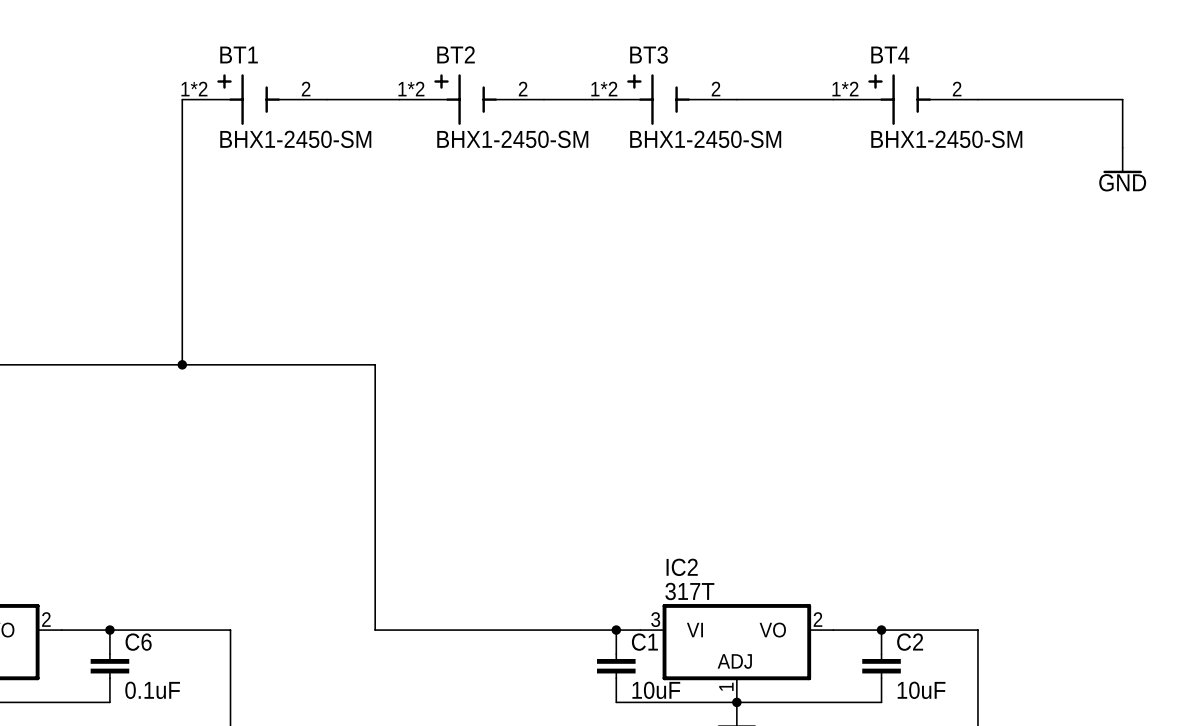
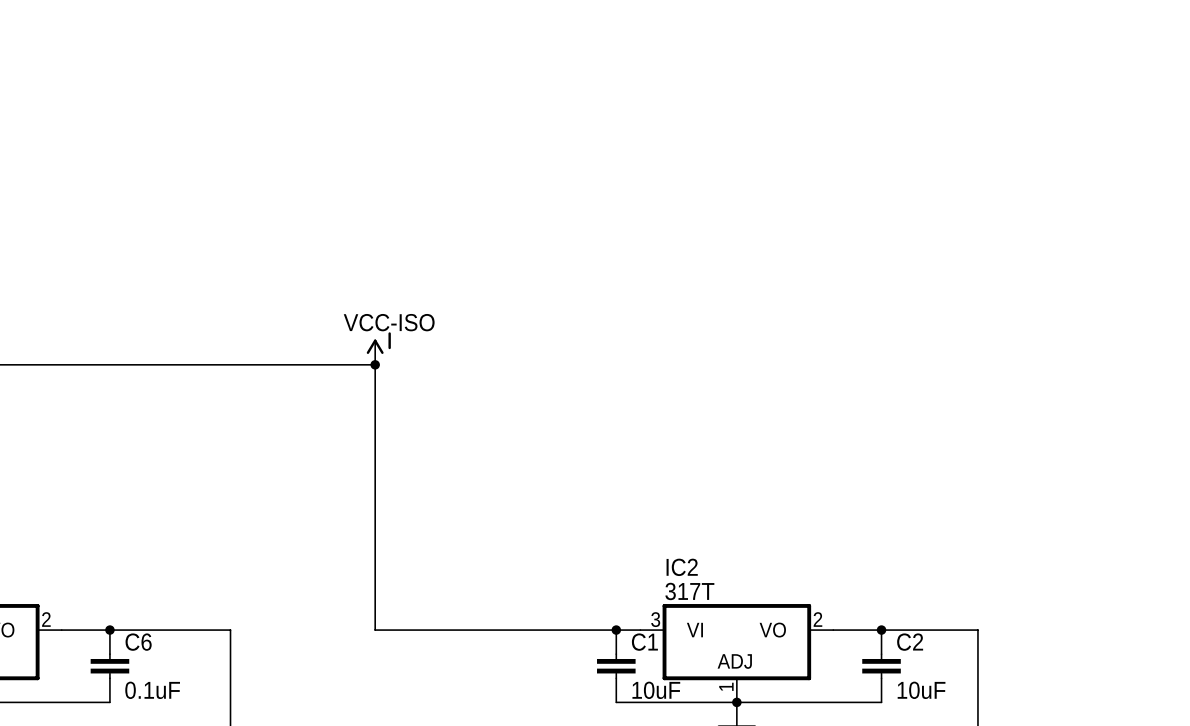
wire: (182, 99) (182, 364) -> none
BT1: BHX1-2450-SM (254, 99) -> none
wire: (326, 99) (399, 99) -> none
BT2: BHX1-2450-SM (471, 99) -> none
wire: (543, 99) (592, 99) -> none
BT3: BHX1-2450-SM (664, 99) -> none
wire: (736, 99) (833, 99) -> none
BT4: BHX1-2450-SM (905, 99) -> none
wire: (977, 99) (1122, 99) (1122, 147) -> none
power symbol: GND (1122, 160) -> none
power symbol: none -> VCC-ISO (378, 348)
junction: (182, 364) -> none
junction: none -> (375, 364)

